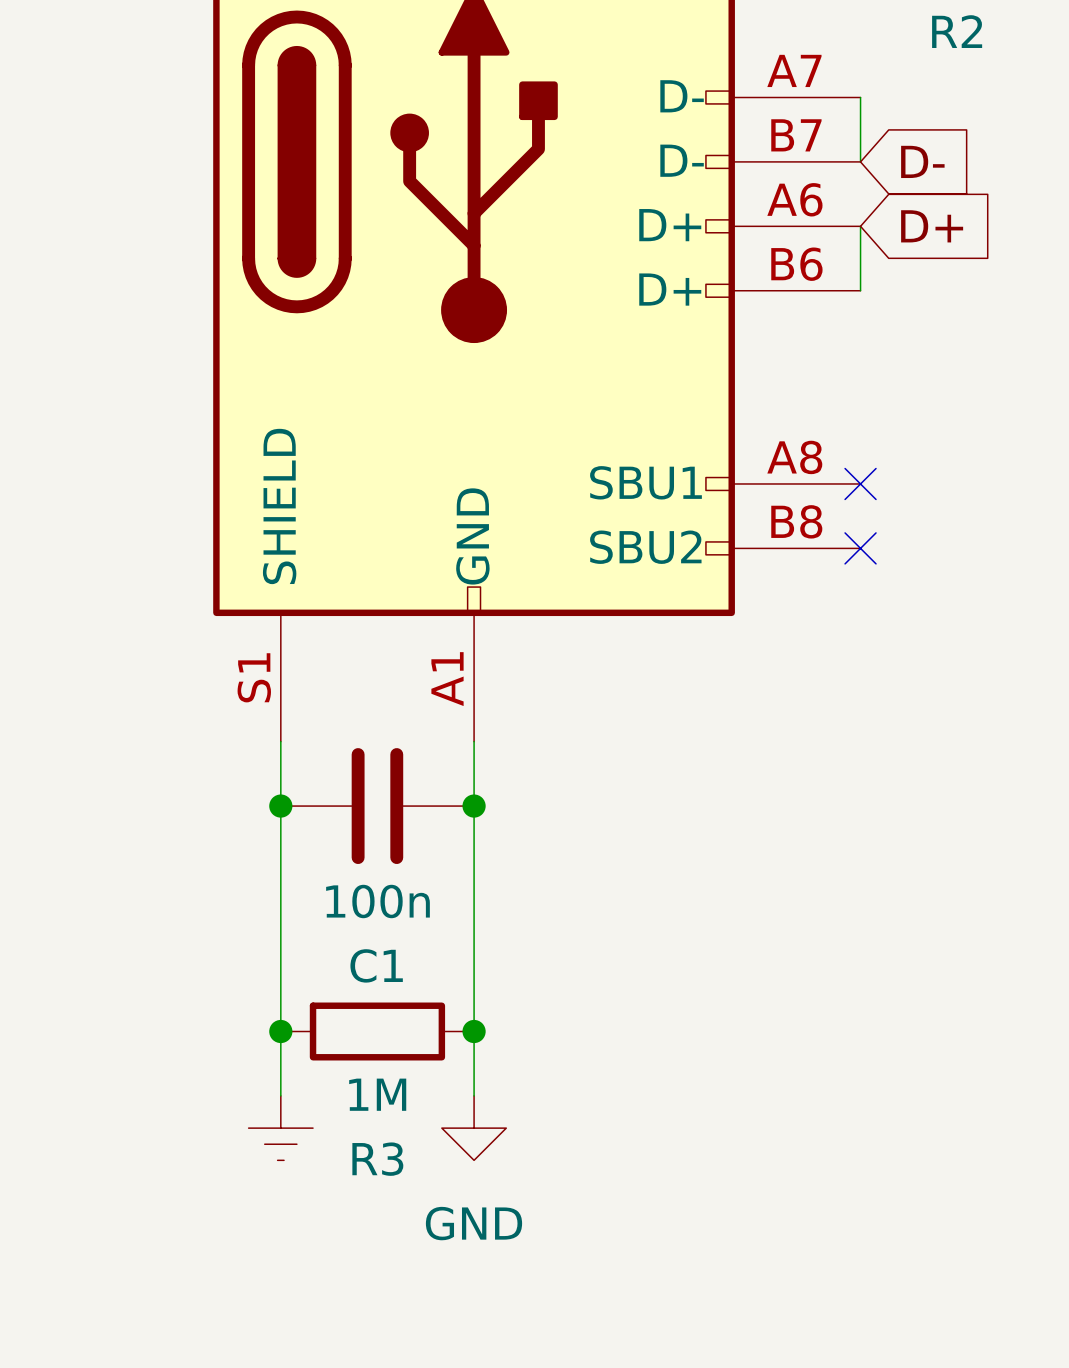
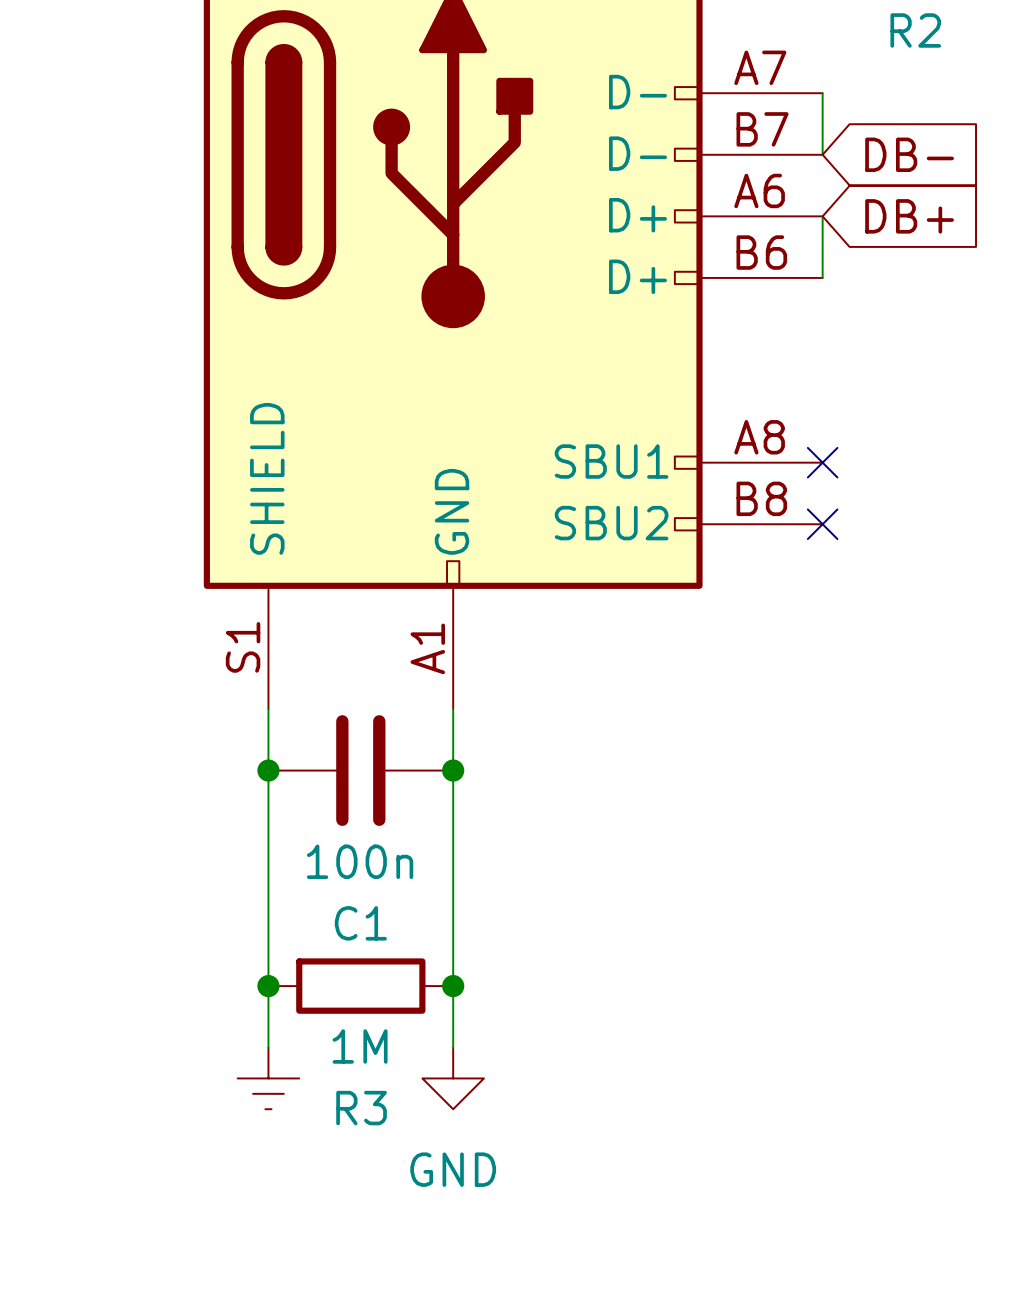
global label: D- (922, 161) -> DB- (909, 154)
global label: D+ (932, 226) -> DB+ (909, 216)

